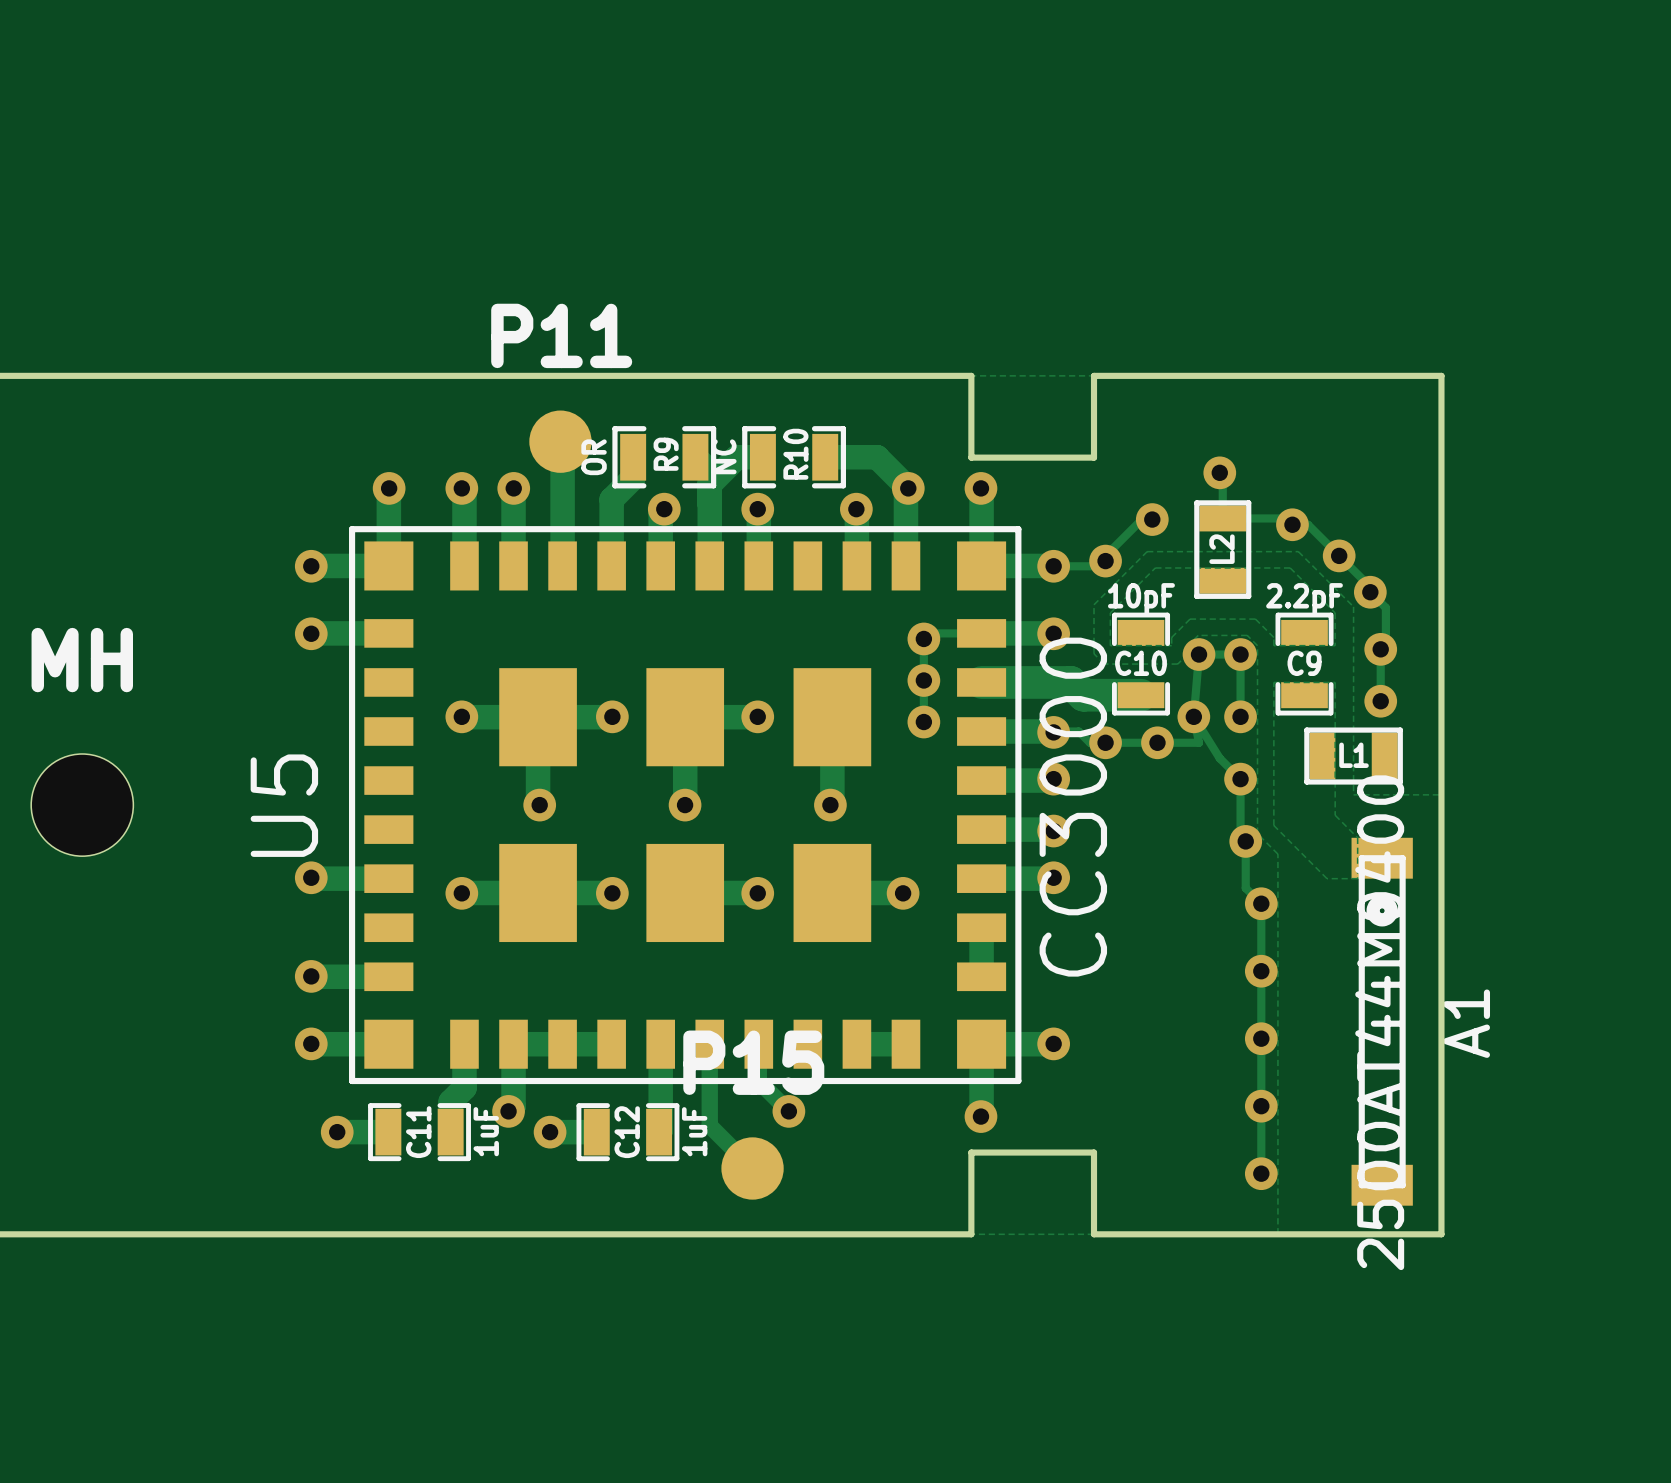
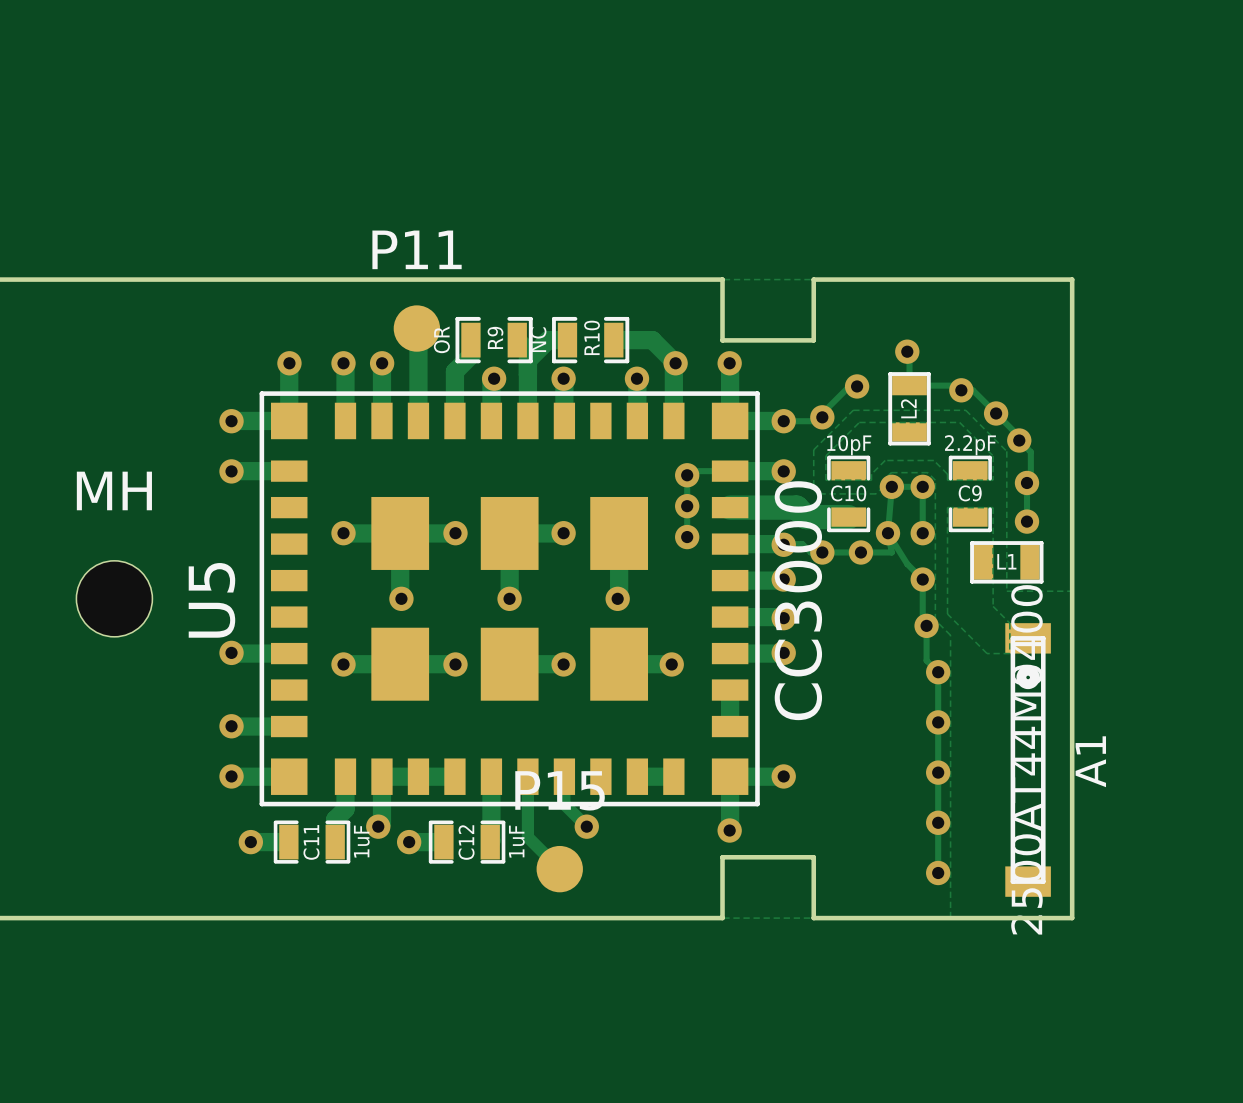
MH position: (82, 805) -> (114, 598)

